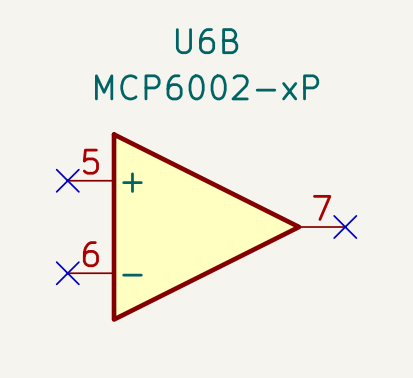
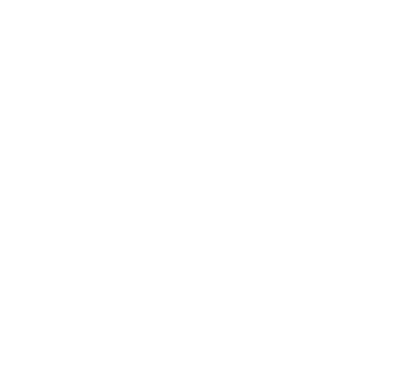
no-connect mark: (67, 180) -> none
U6B: MCP6002-xP (206, 226) -> none
no-connect mark: (345, 226) -> none
no-connect mark: (67, 273) -> none

